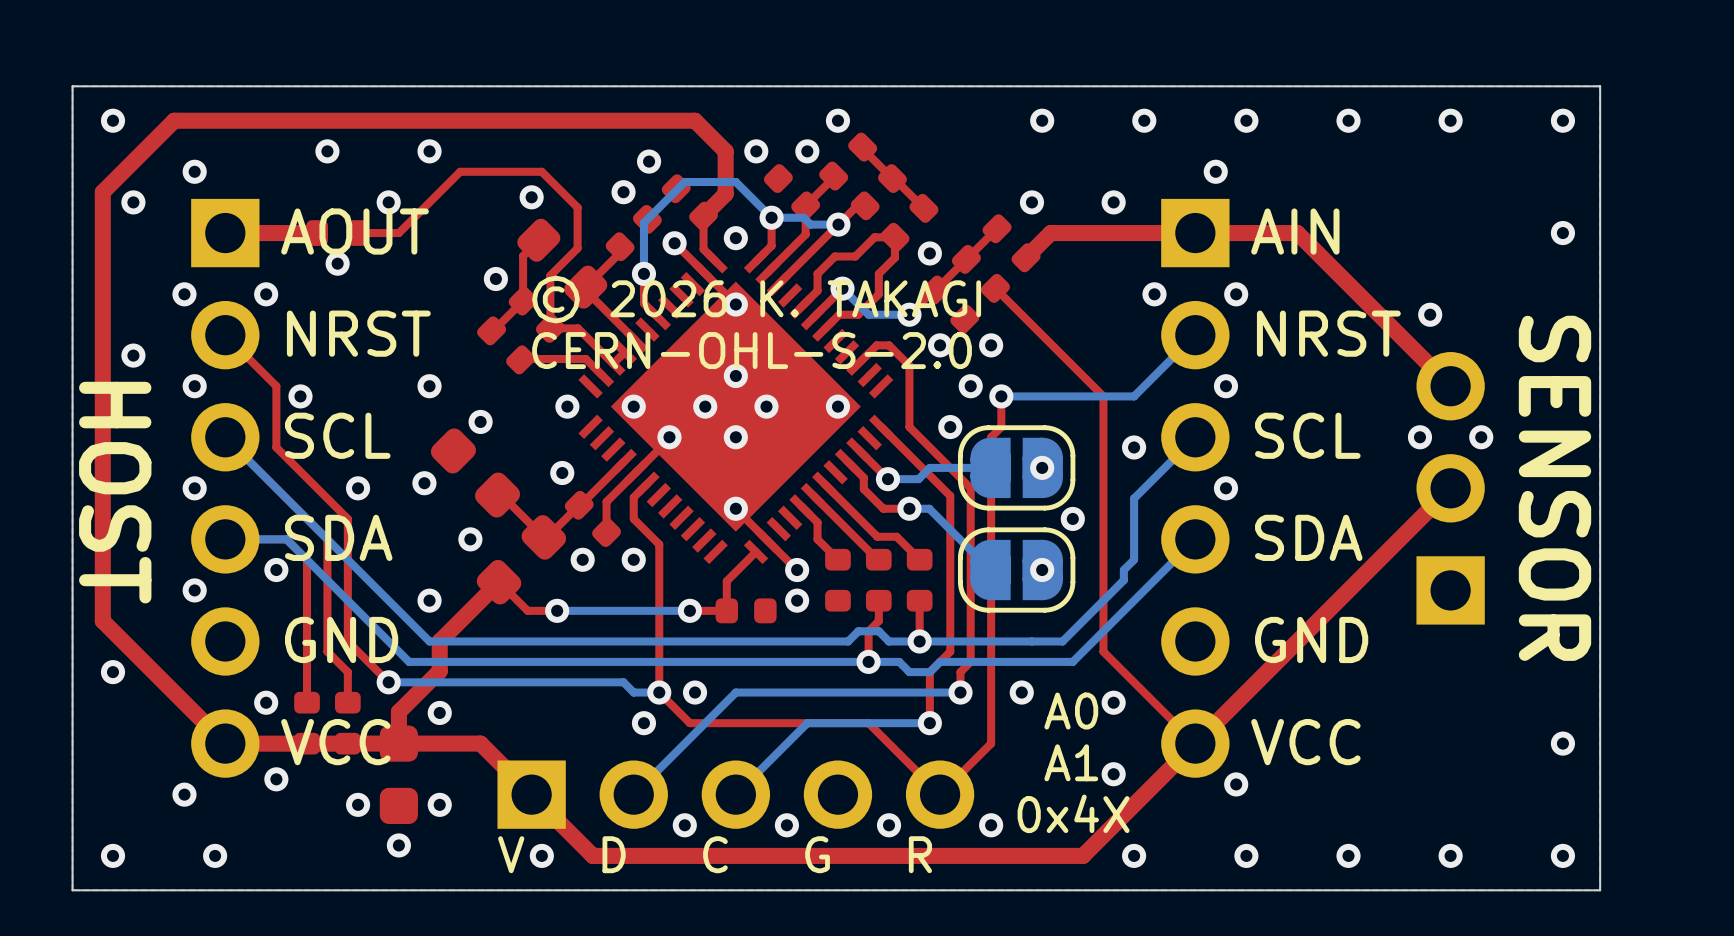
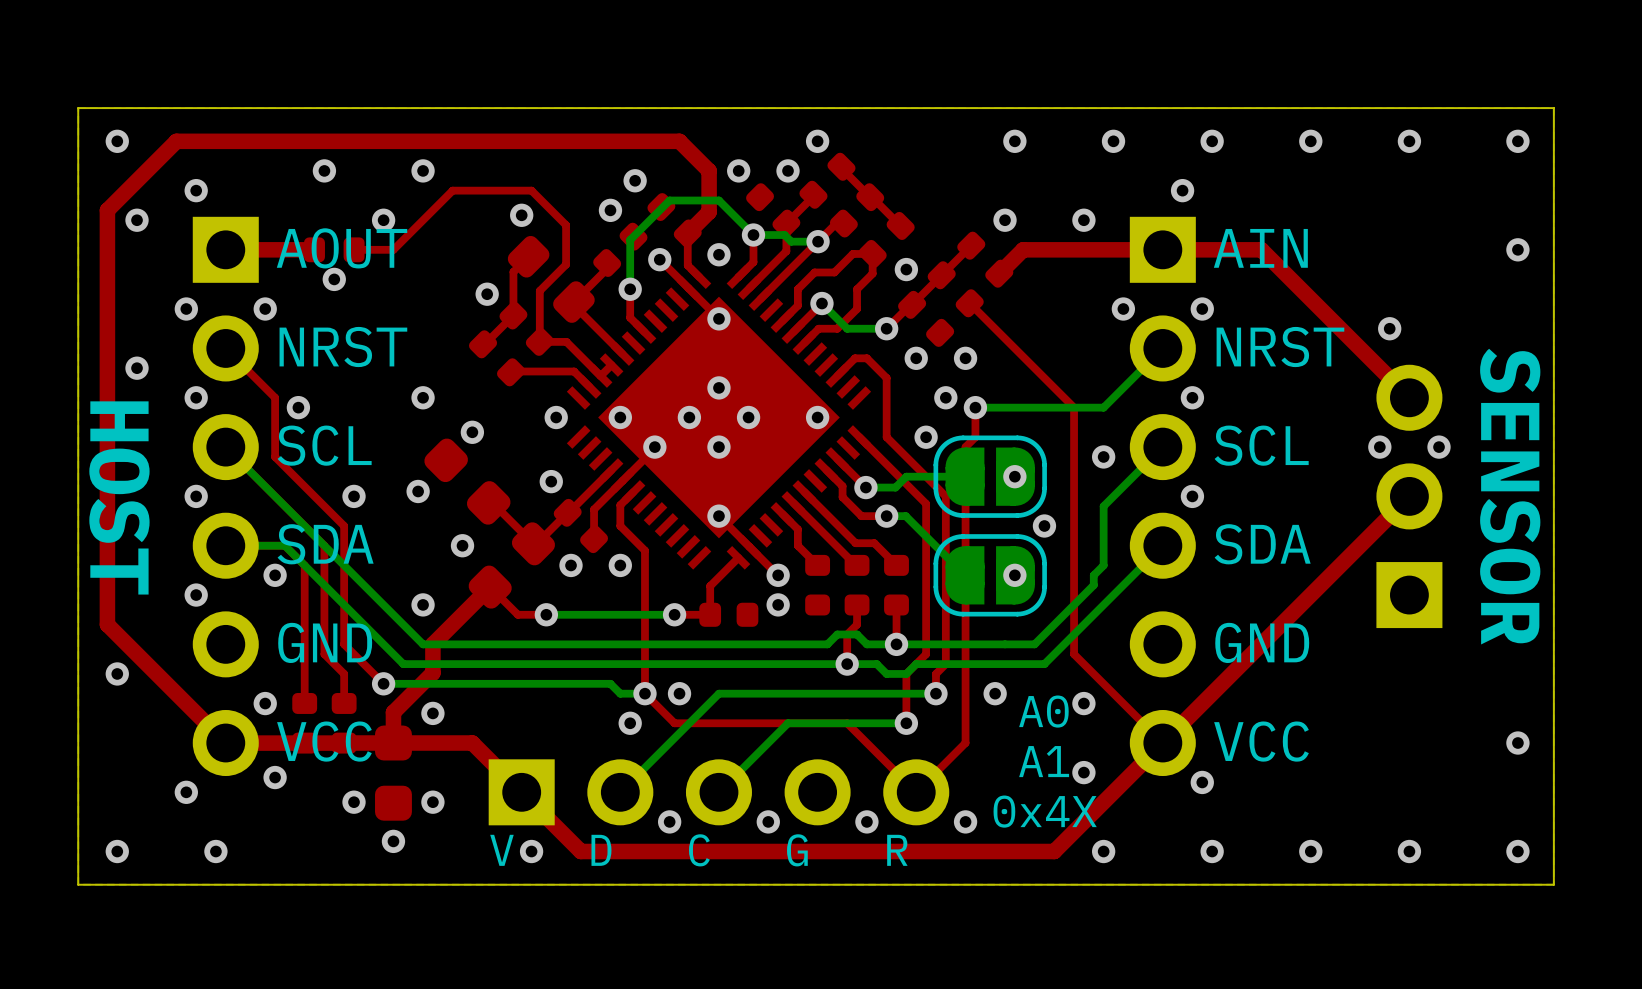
text: © 2026 K. TAKAGI (756, 299) -> none
text: CERN-OHL-S-2.0 (752, 350) -> none

